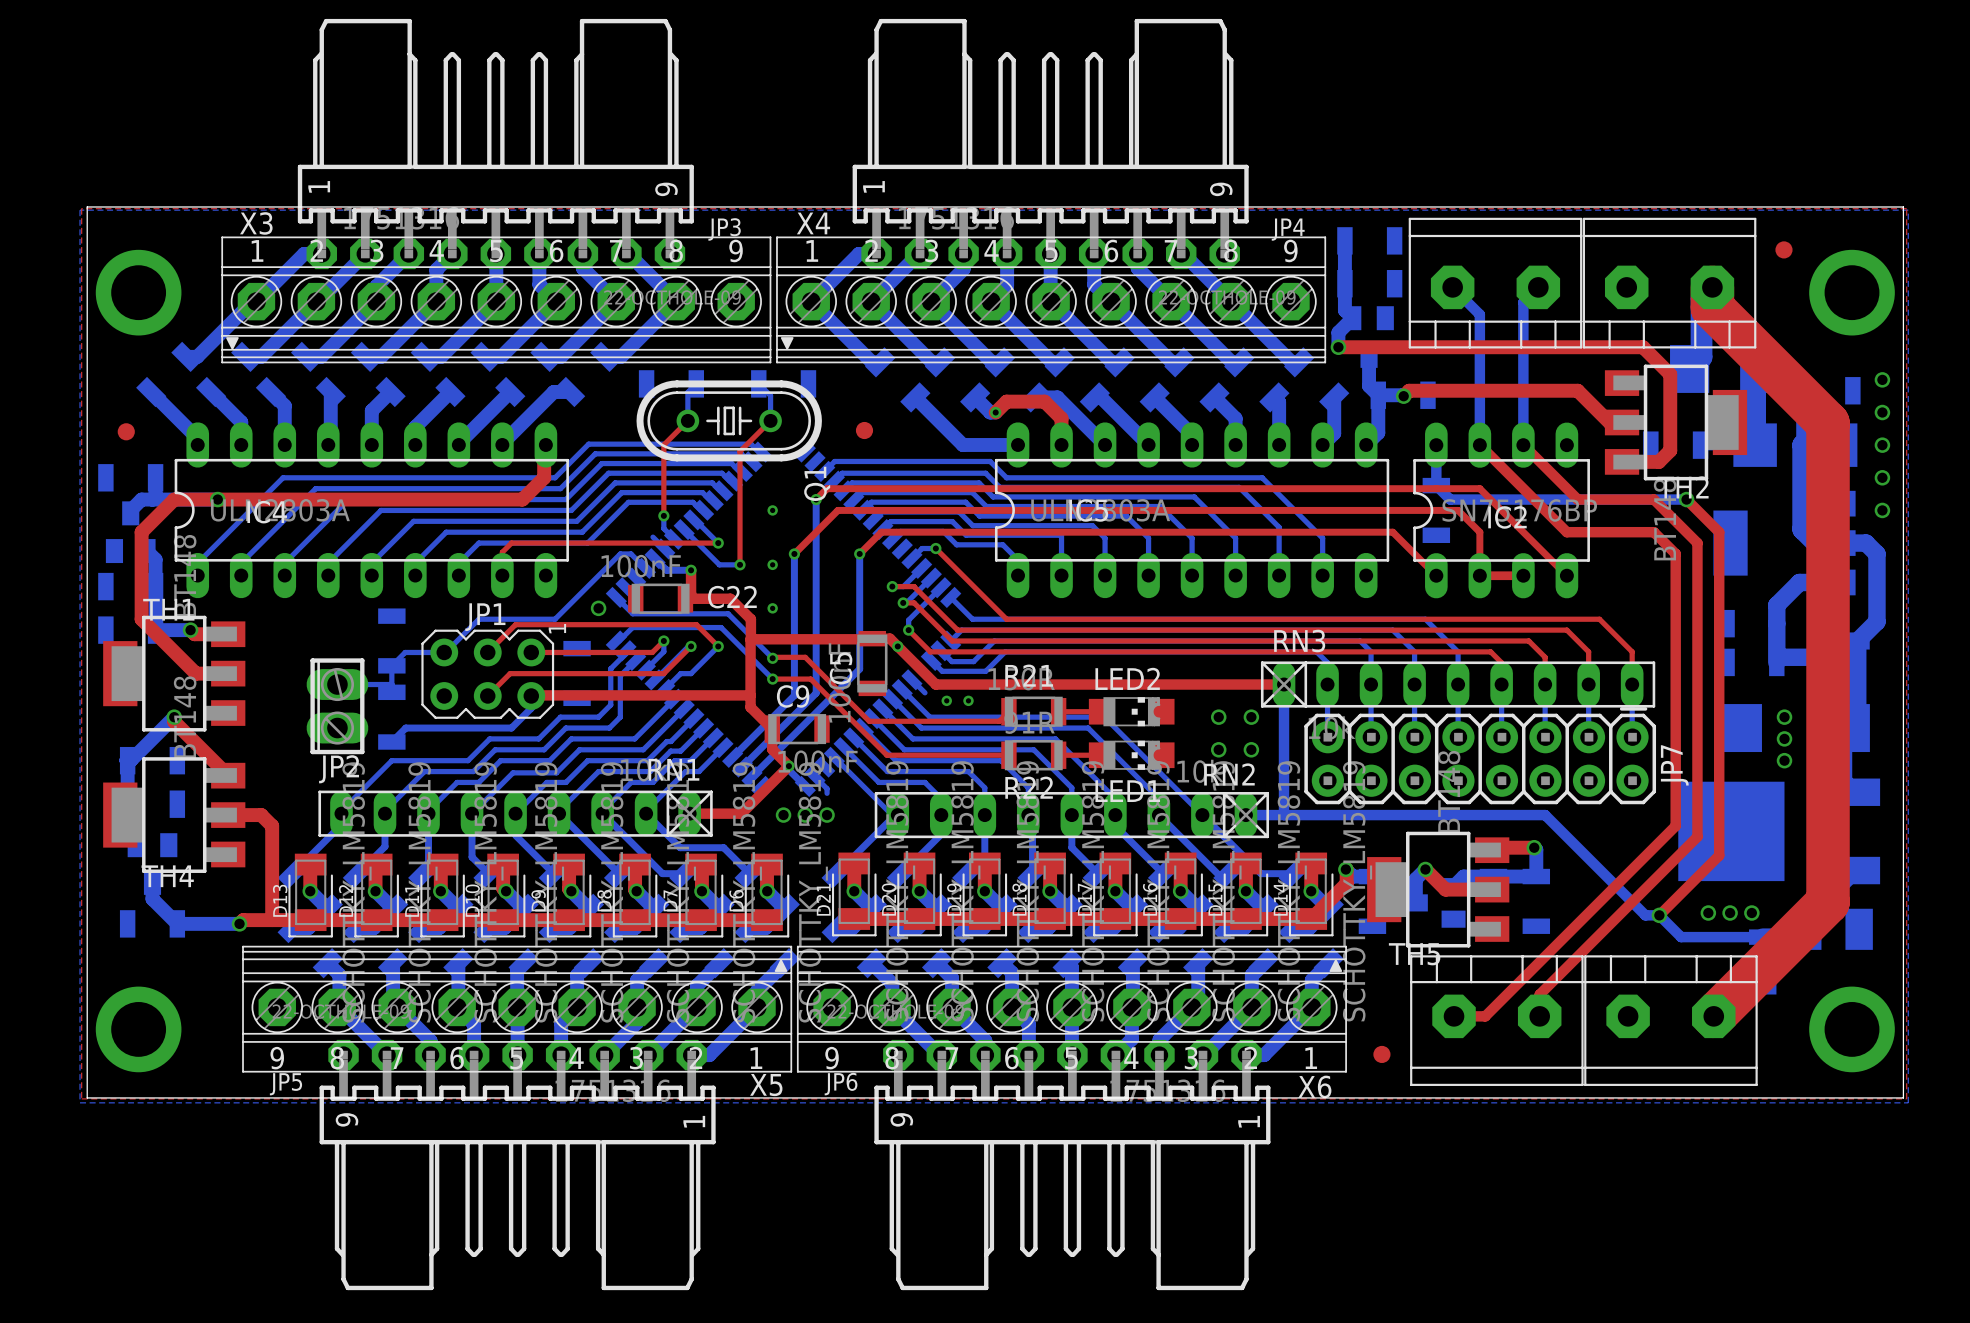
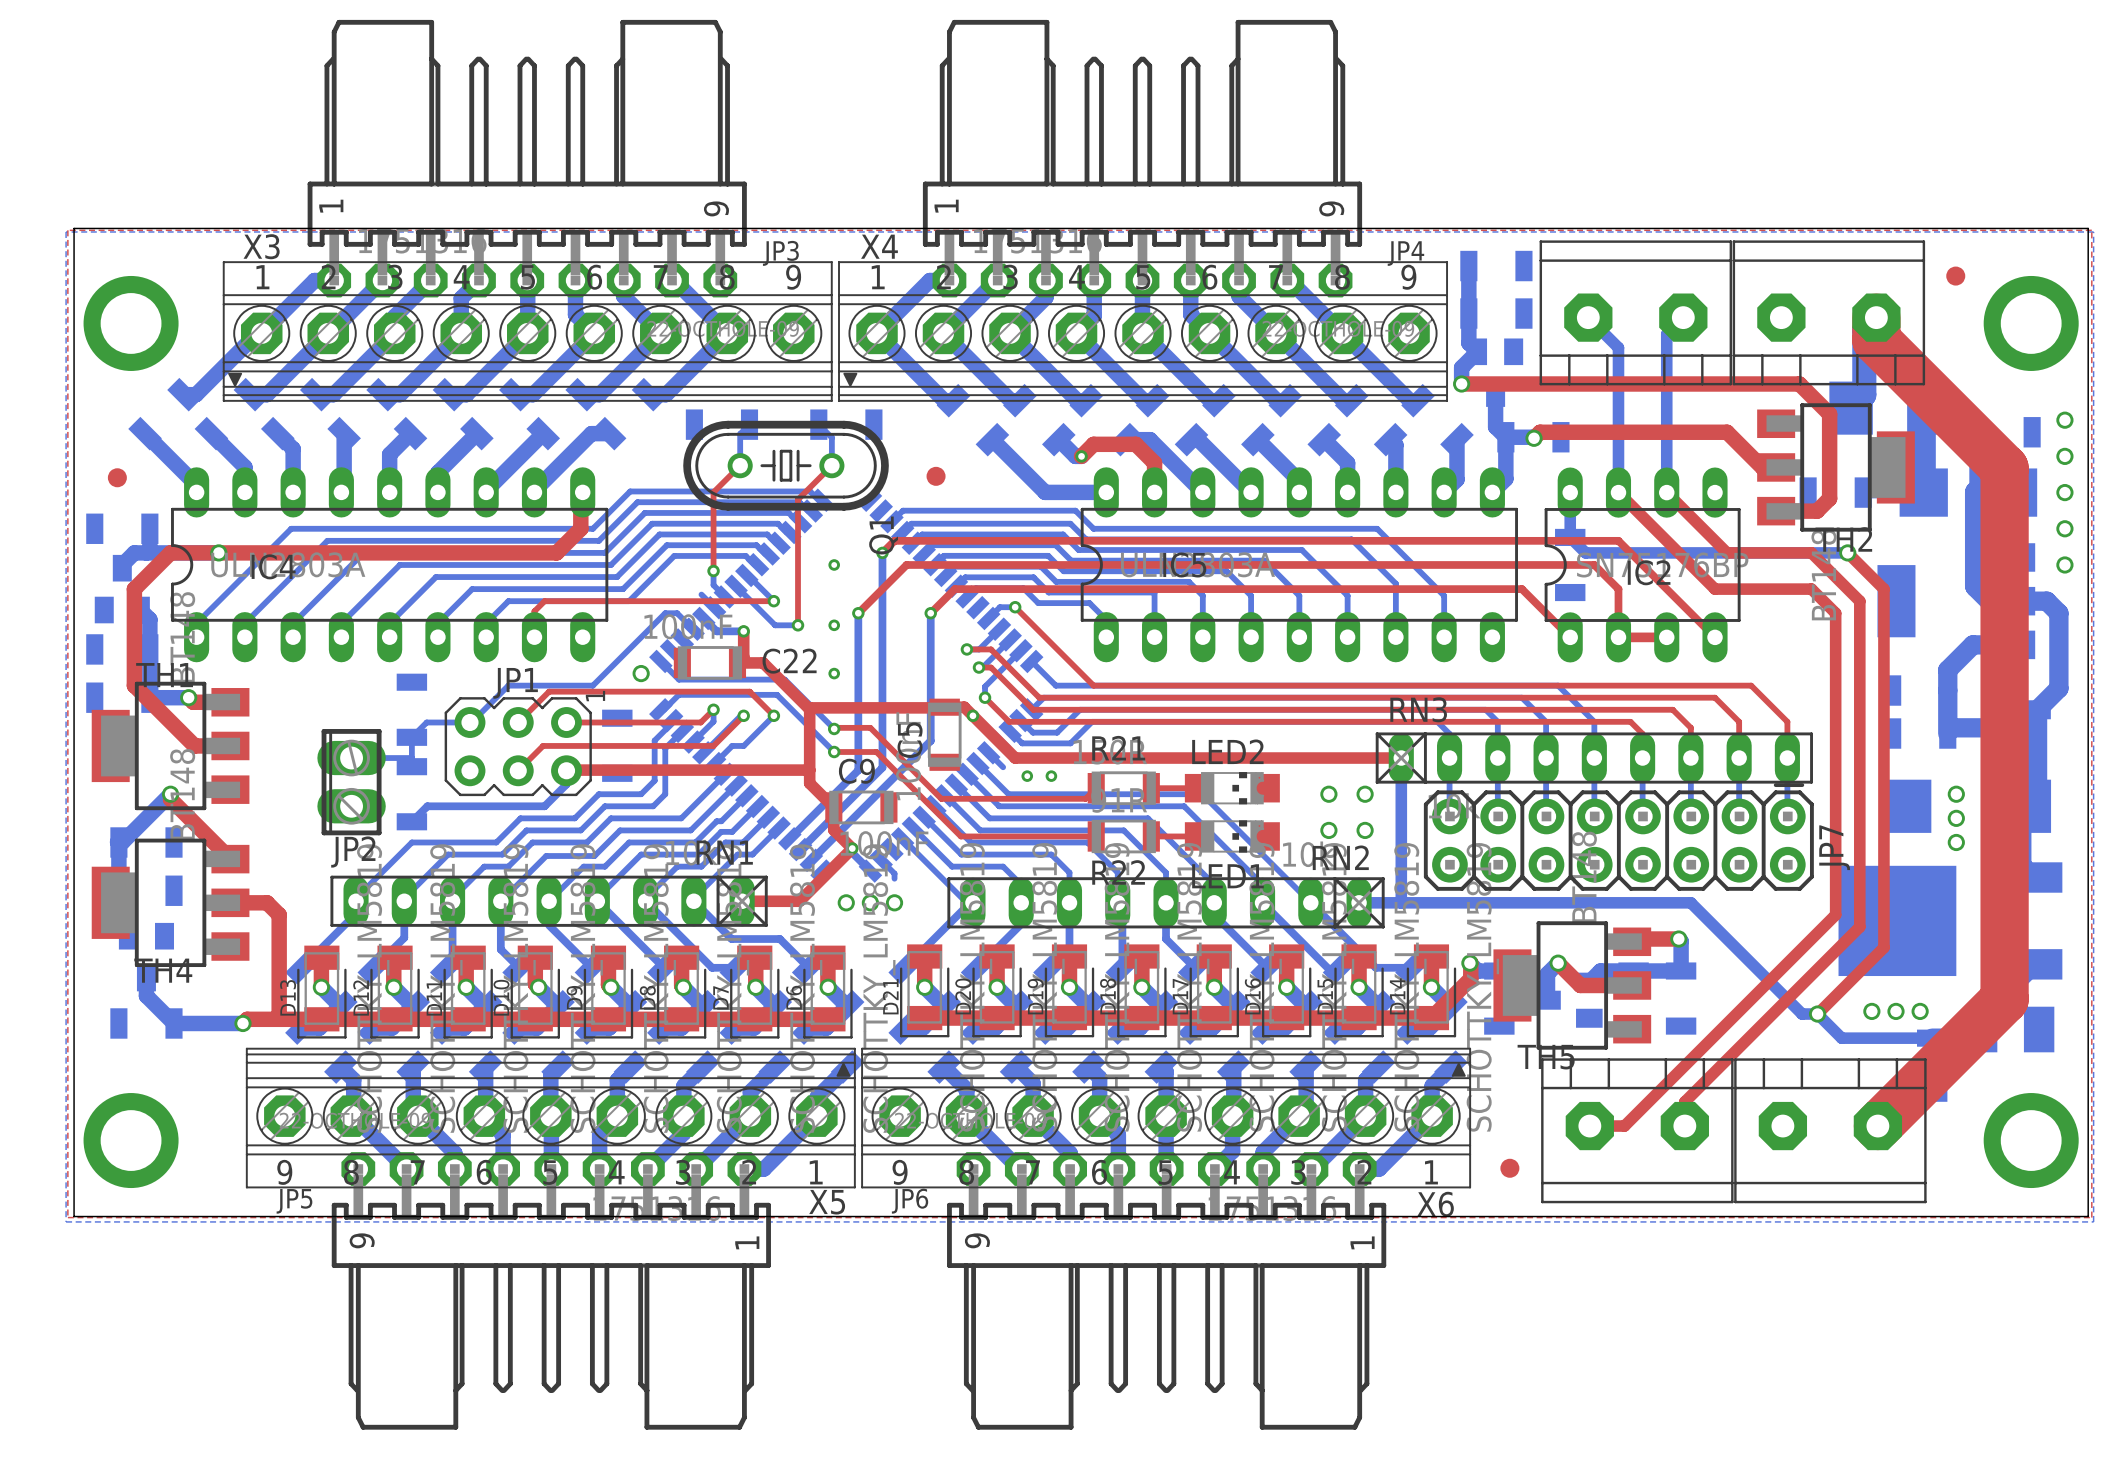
top track: (708, 598) (730, 598) (750, 619) (750, 639) -> (763, 662) (809, 708)

